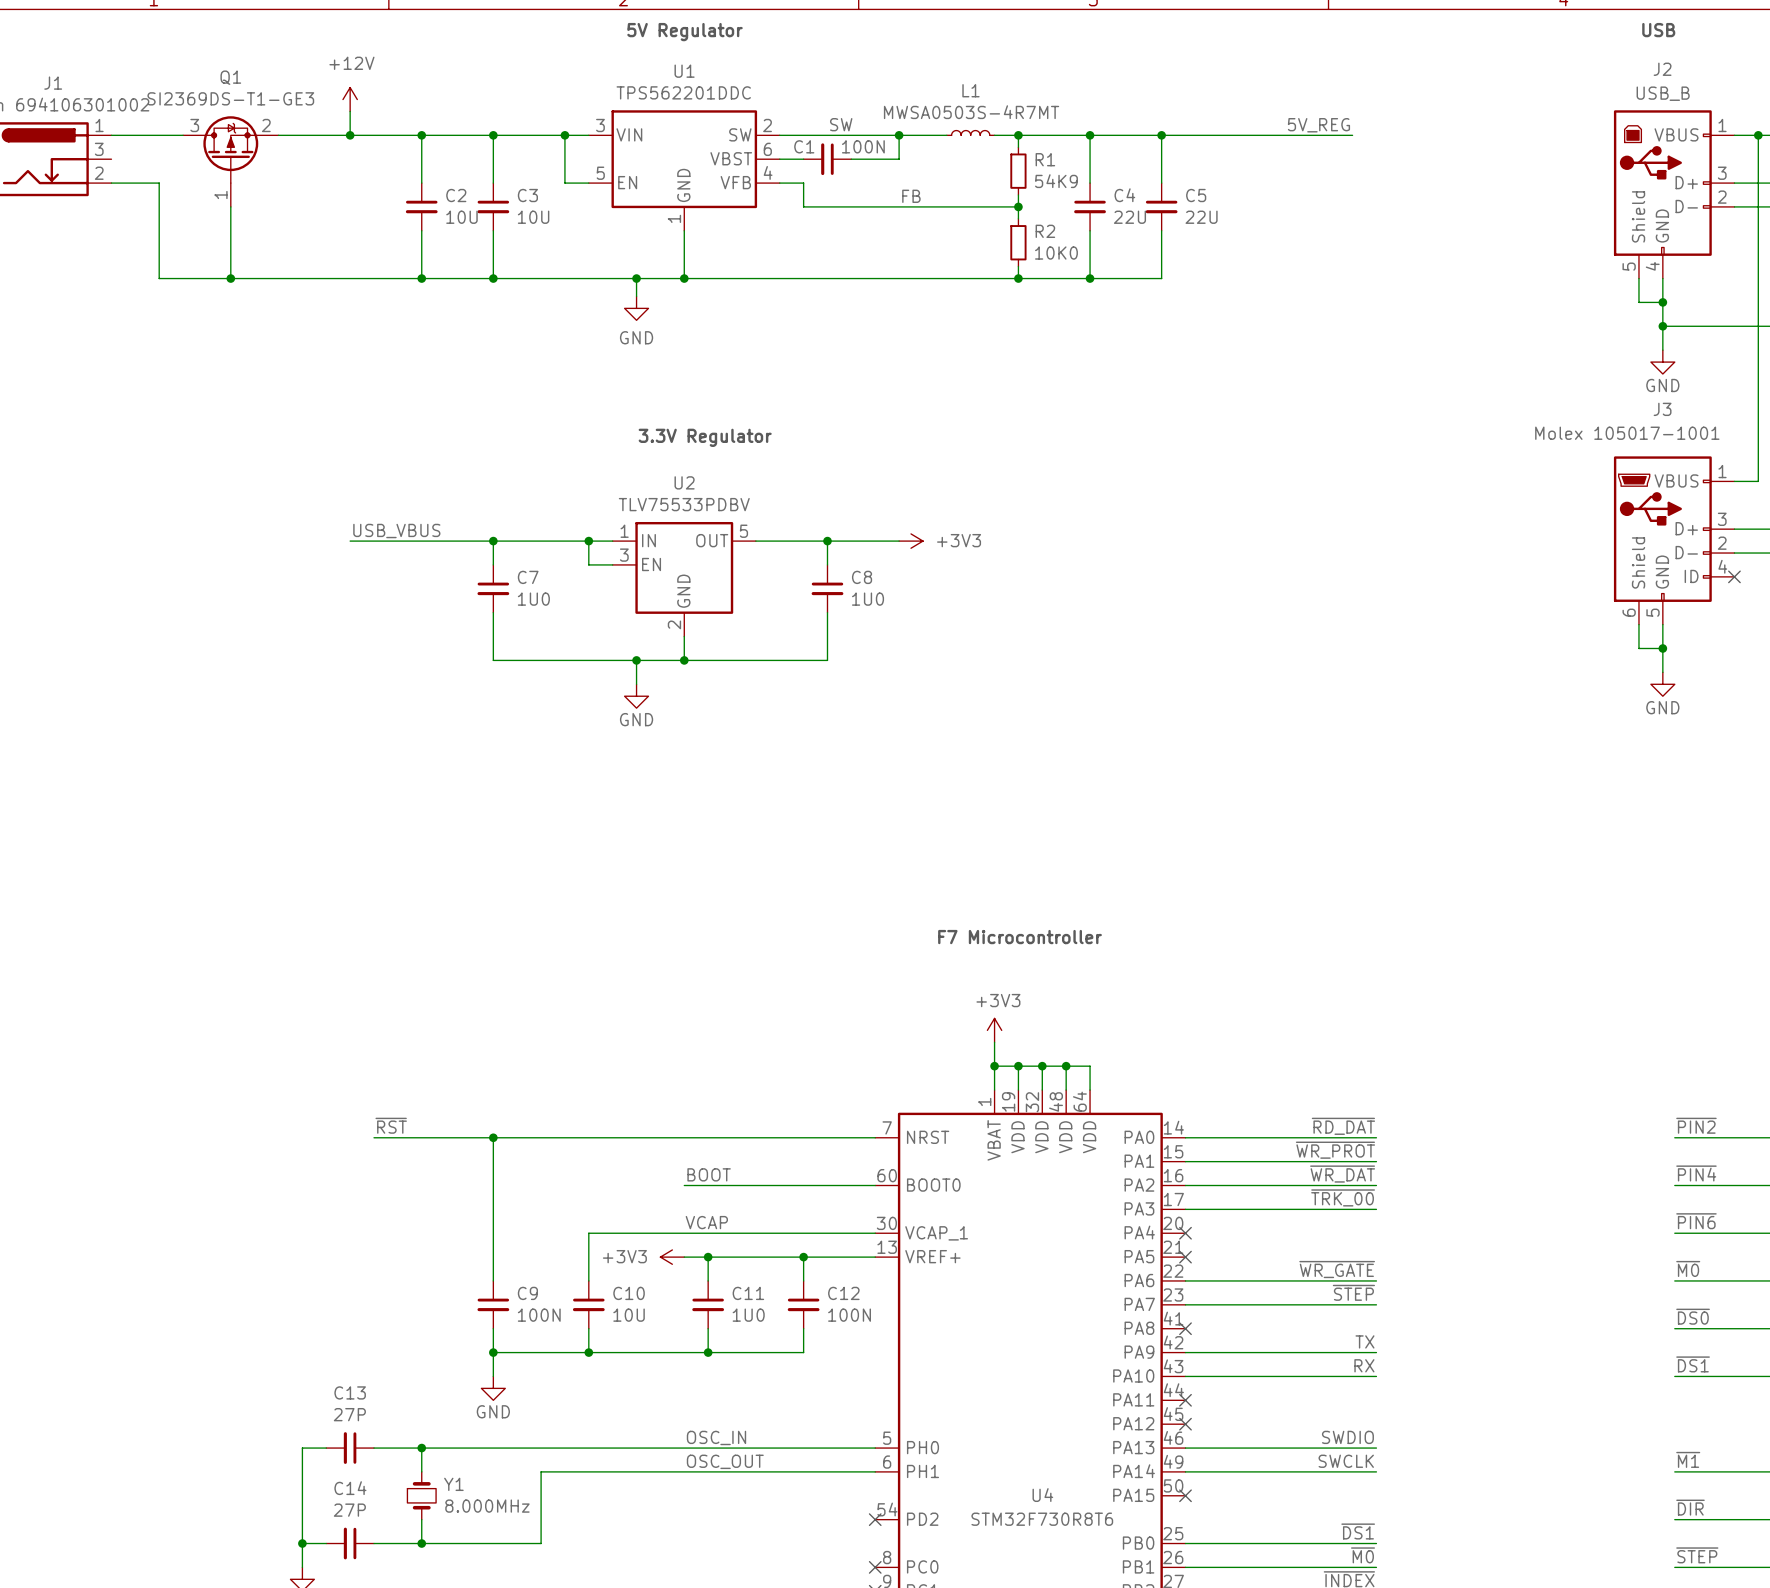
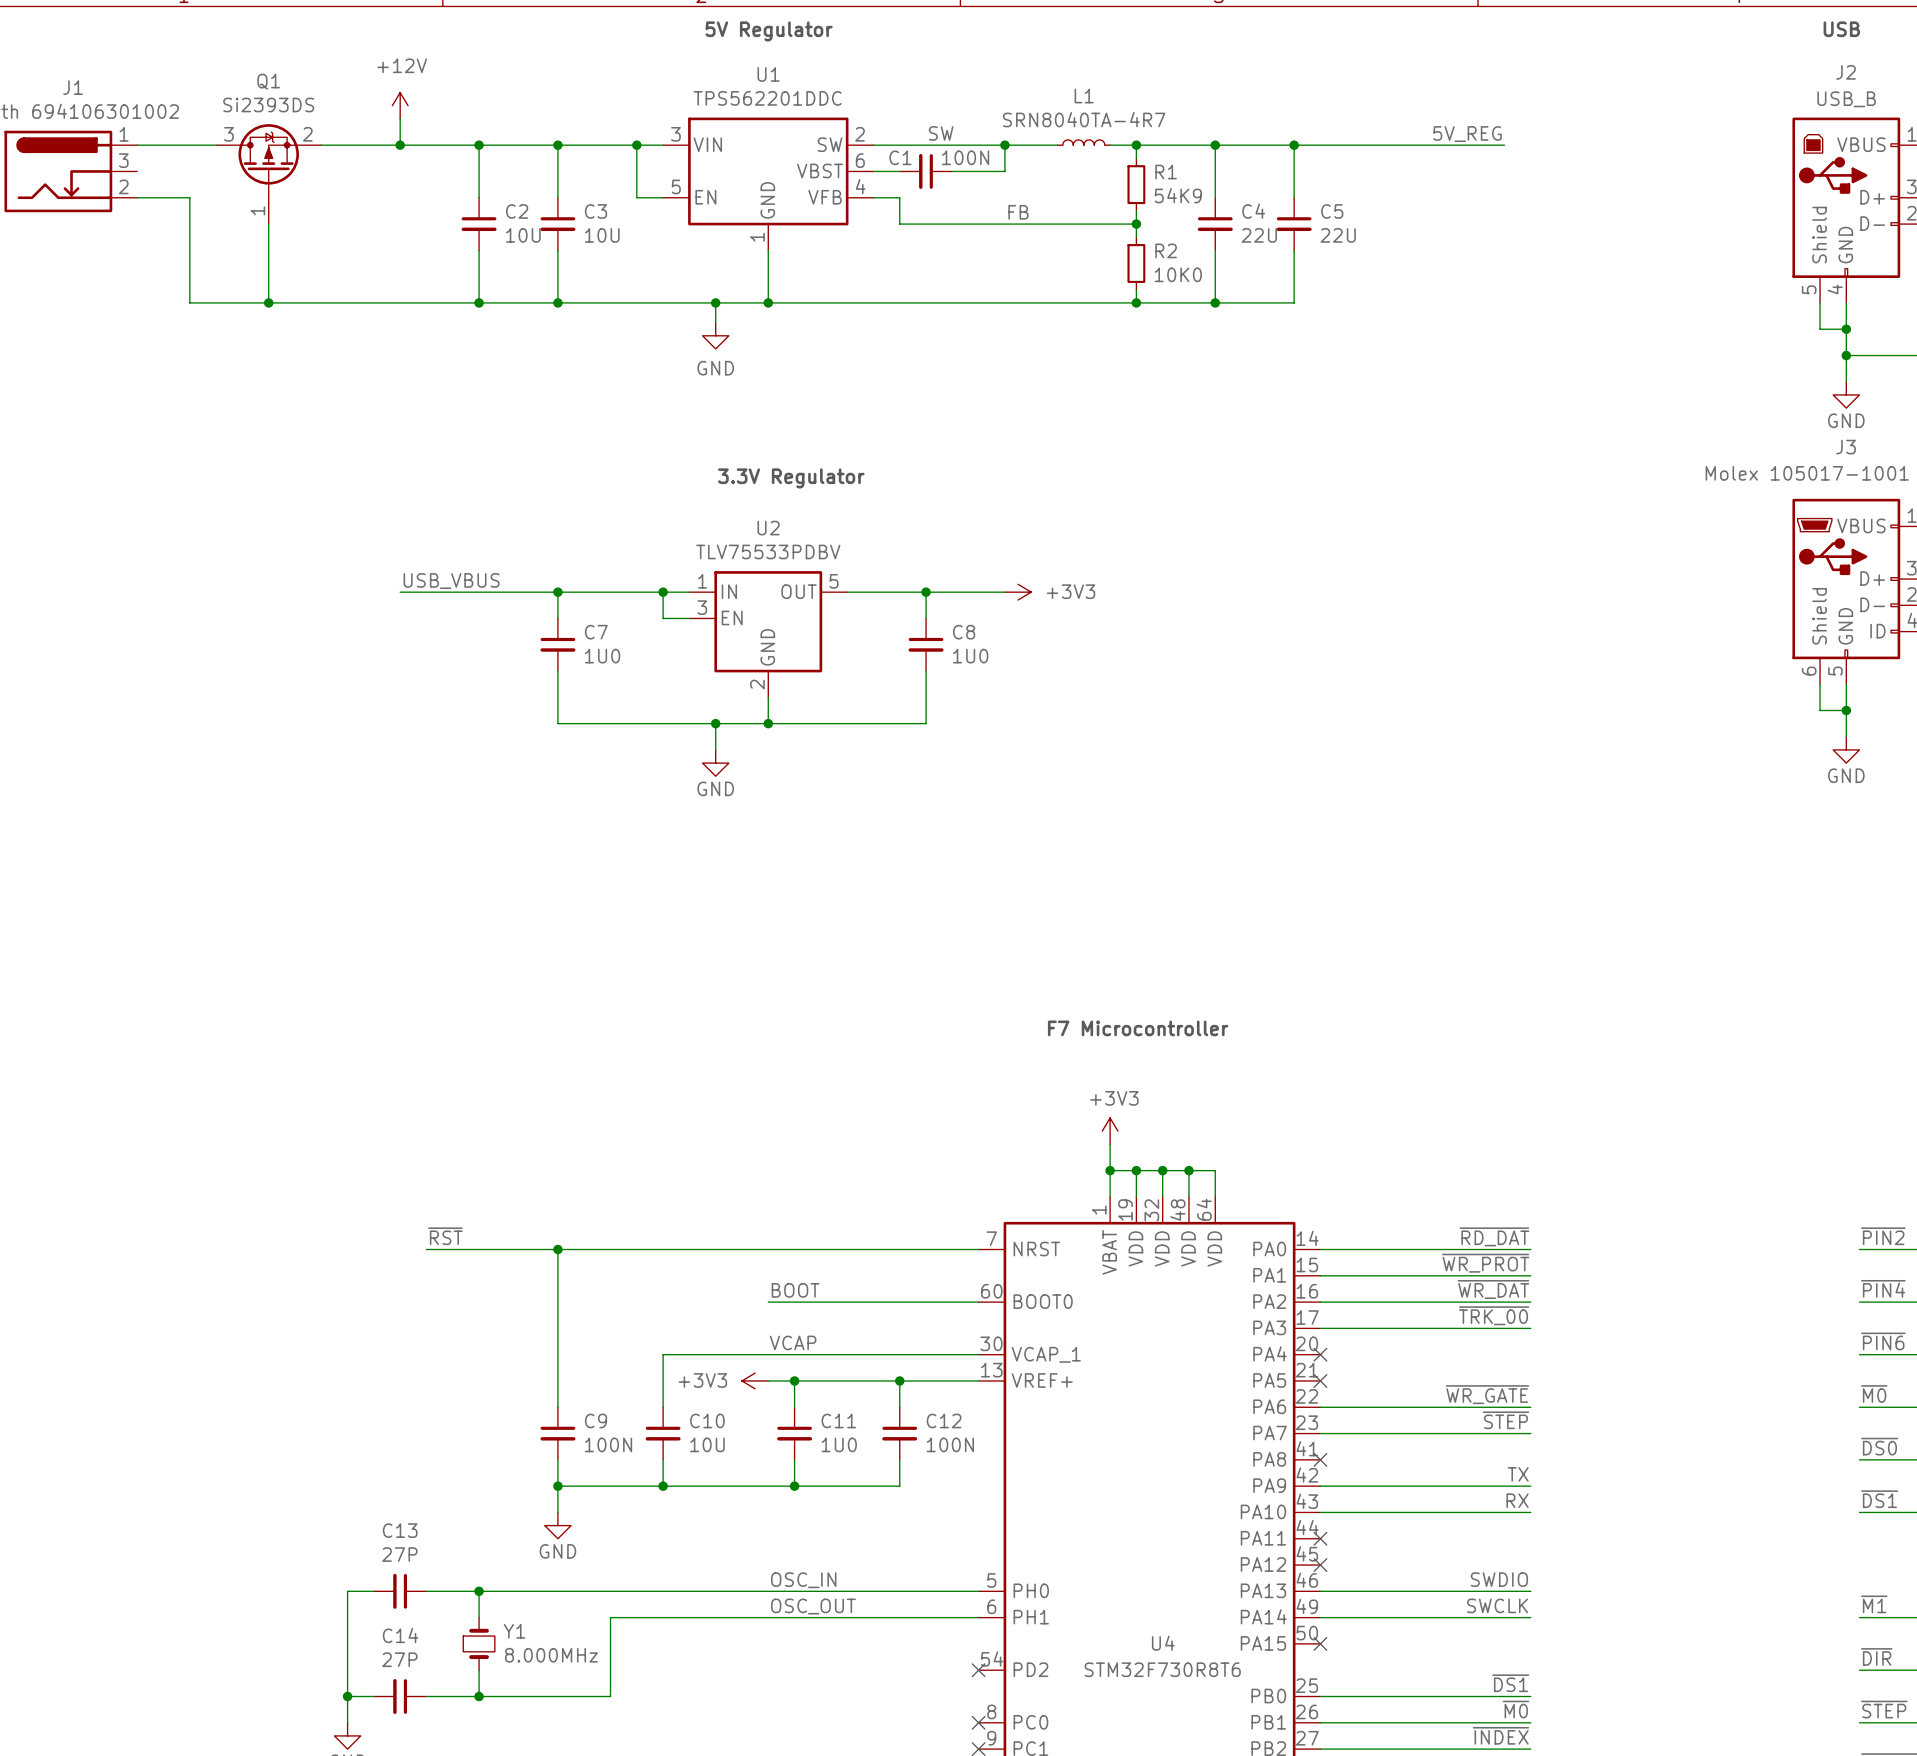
Q1 value: SI2369DS-T1-GE3 (230, 98) -> Si2393DS (268, 104)
L1 value: MWSA0503S-4R7MT (971, 112) -> SRN8040TA-4R7 (1084, 119)

